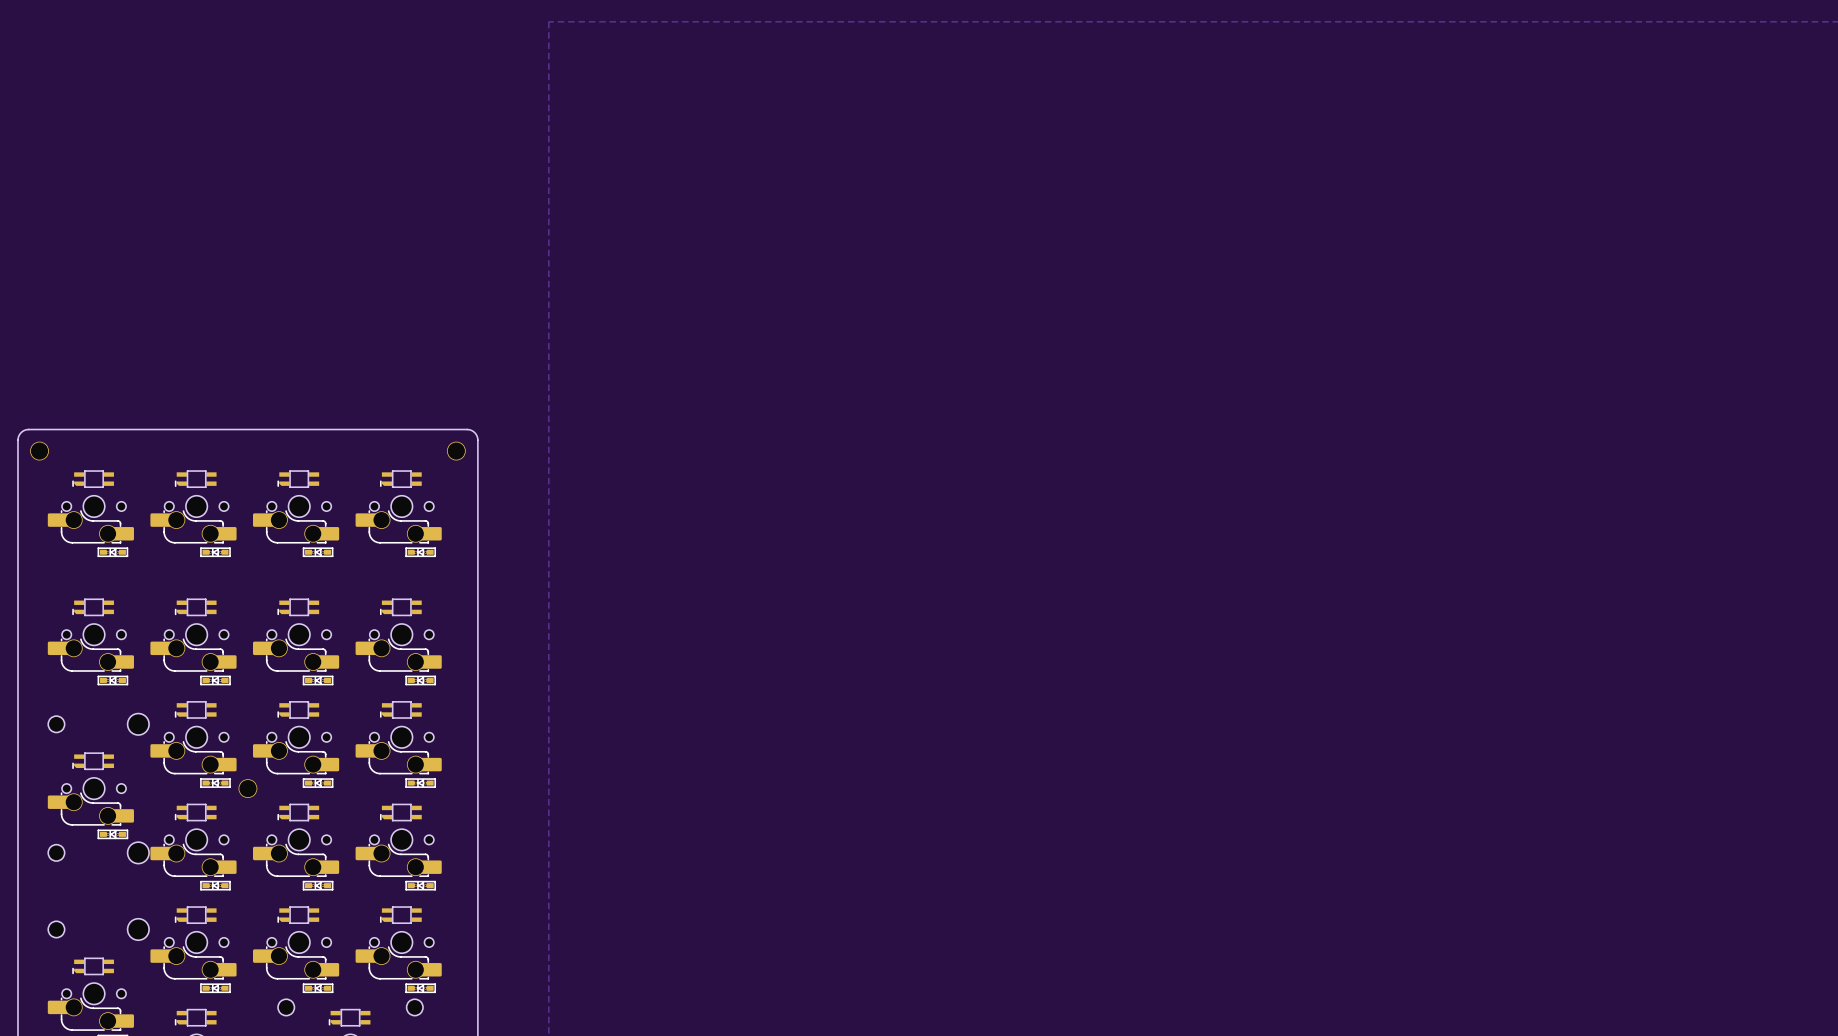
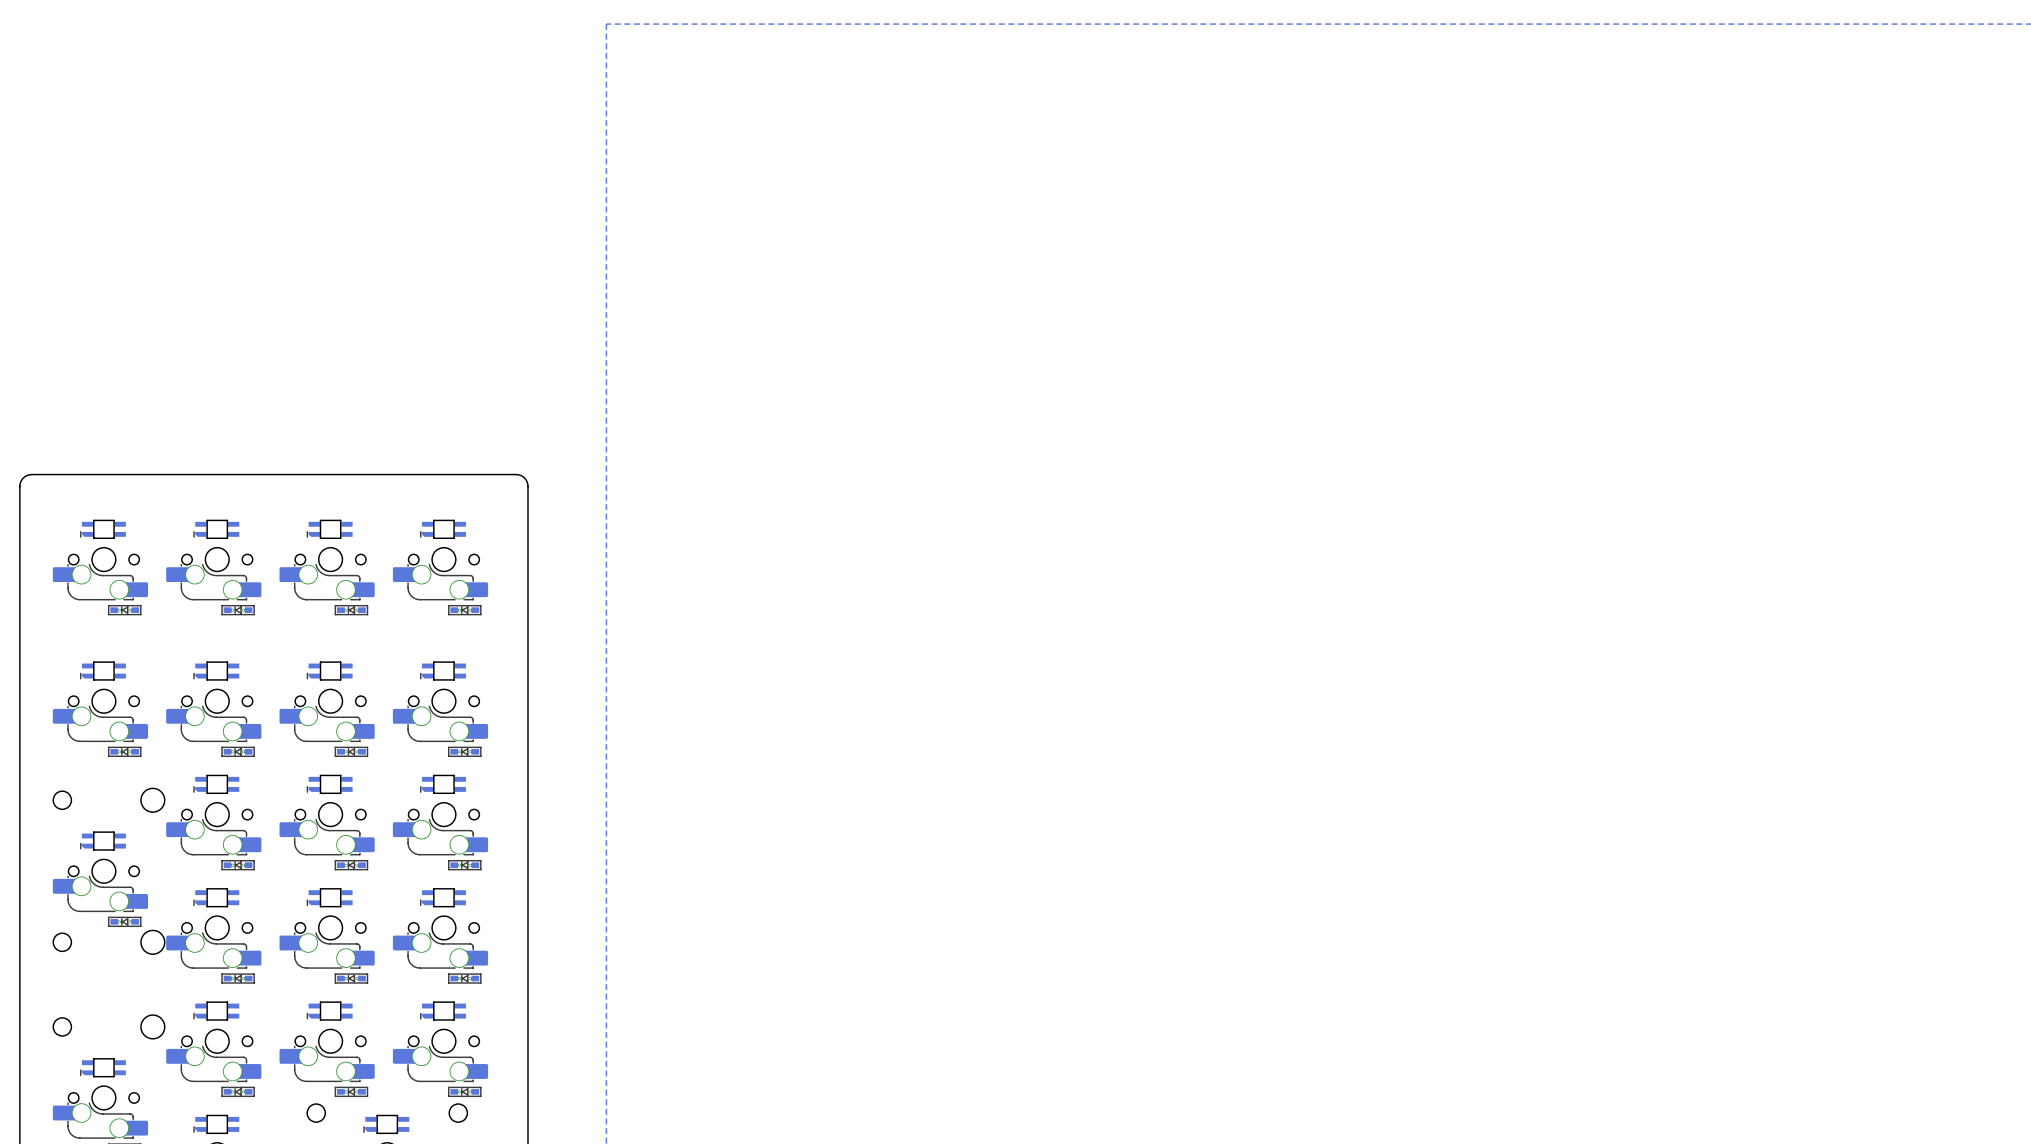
part: (39, 451) -> none
part: (456, 451) -> none
part: (247, 788) -> none

